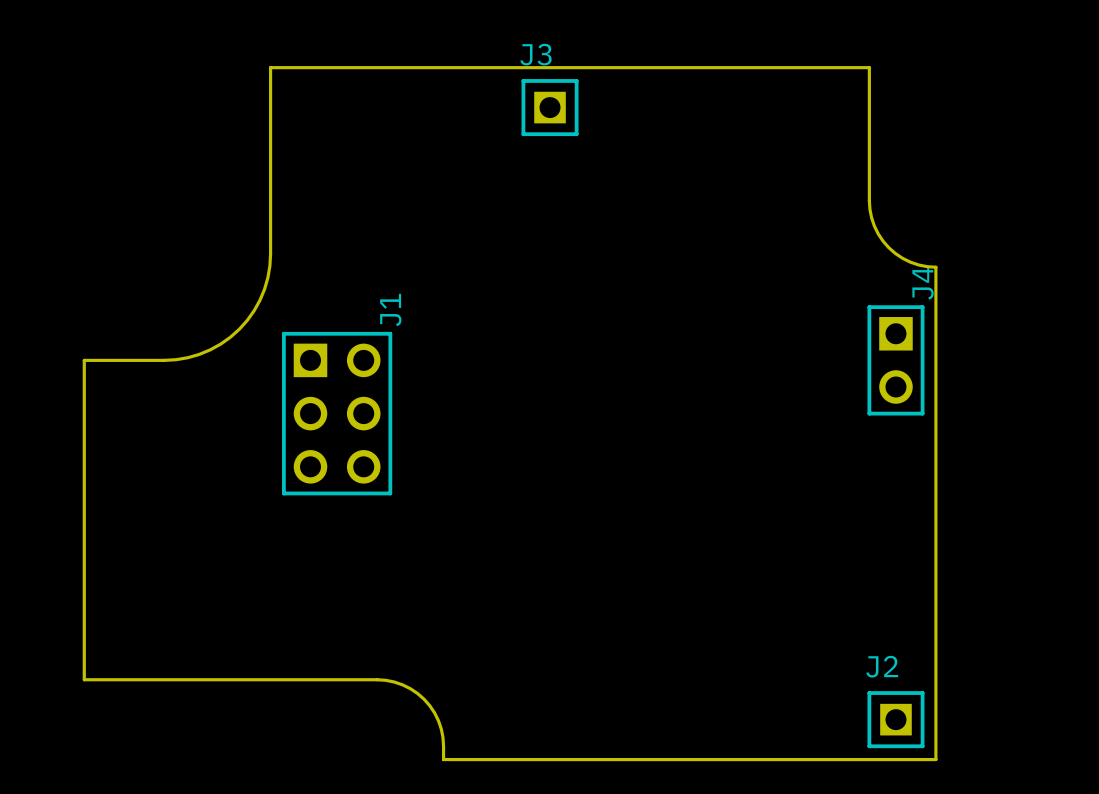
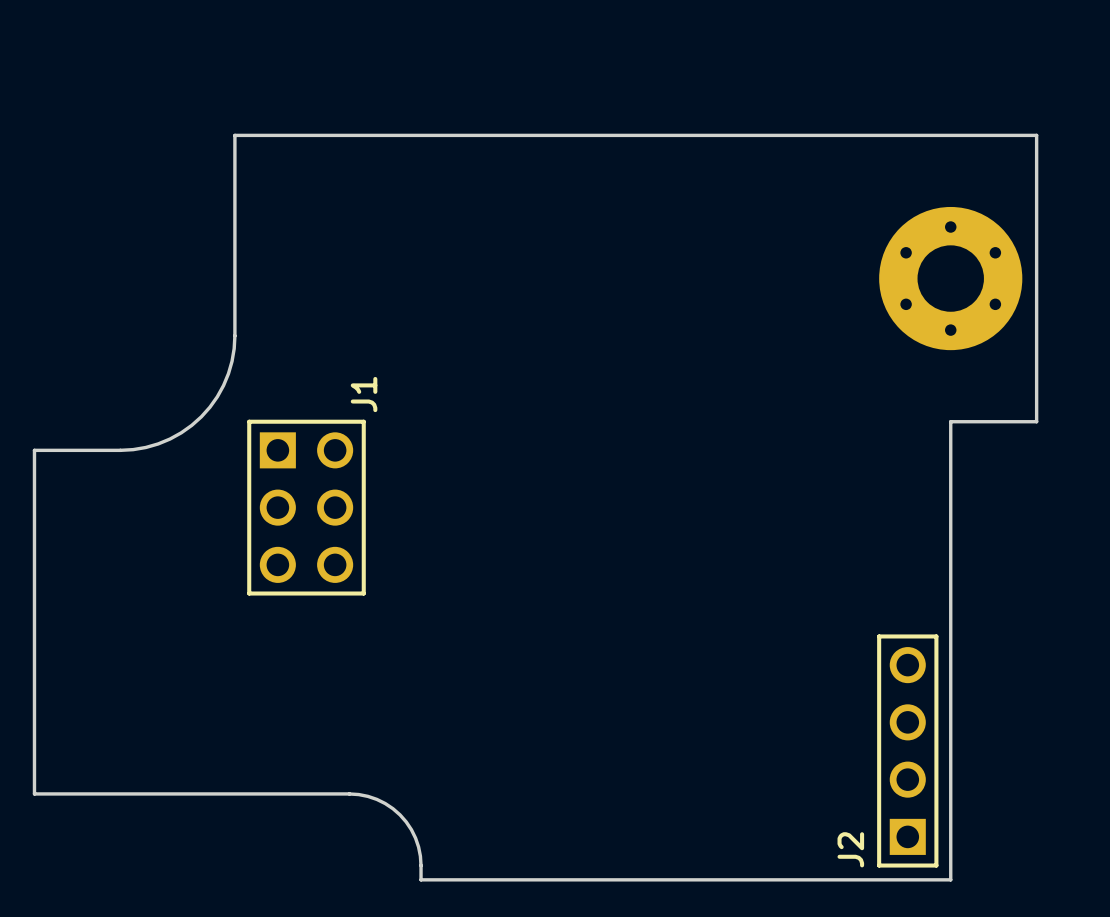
board edge: (869, 67) (869, 200) (871, 217) (878, 233) (895, 253) (910, 262) (935, 267) -> (879, 135) (1036, 135) (1036, 421) (950, 421)
J3: (550, 107) -> none
part: none -> (950, 278)
board edge: (935, 267) (935, 333) -> none
J4: (895, 360) -> none
J2 name position: J2 (882, 666) -> J2 (850, 849)
J2 footprint: [867, 691, 925, 749] -> [877, 634, 939, 868]

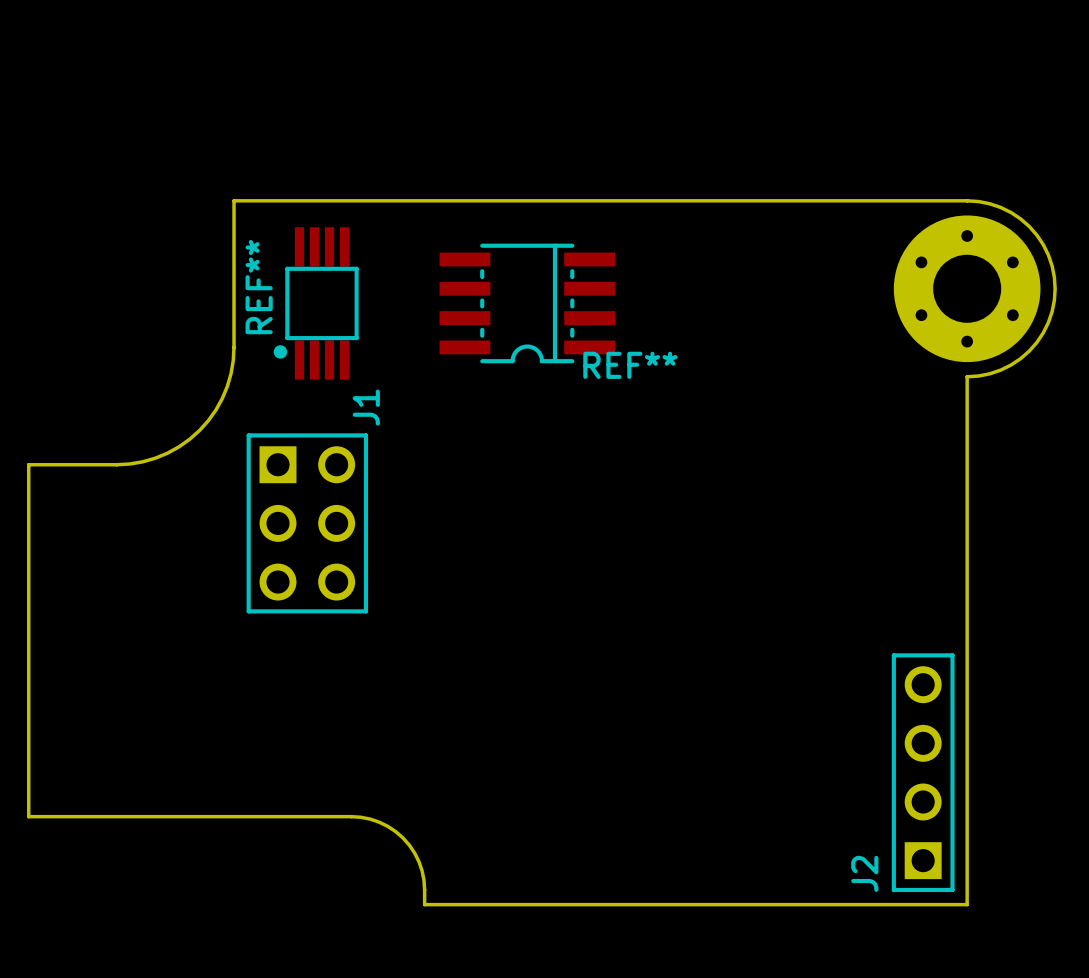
board edge: (234, 192) (234, 135) (1036, 135) (1036, 421) (950, 421) -> (234, 200) (967, 200) (989, 203) (1000, 207) (1020, 218) (1029, 226) (1043, 244) (1052, 266) (1054, 277) (1054, 300) (1052, 311) (1043, 332) (1029, 350) (1011, 364) (1000, 370) (978, 376) (967, 376) (967, 435)
REF**: none -> (316, 303)
REF**: none -> (527, 303)

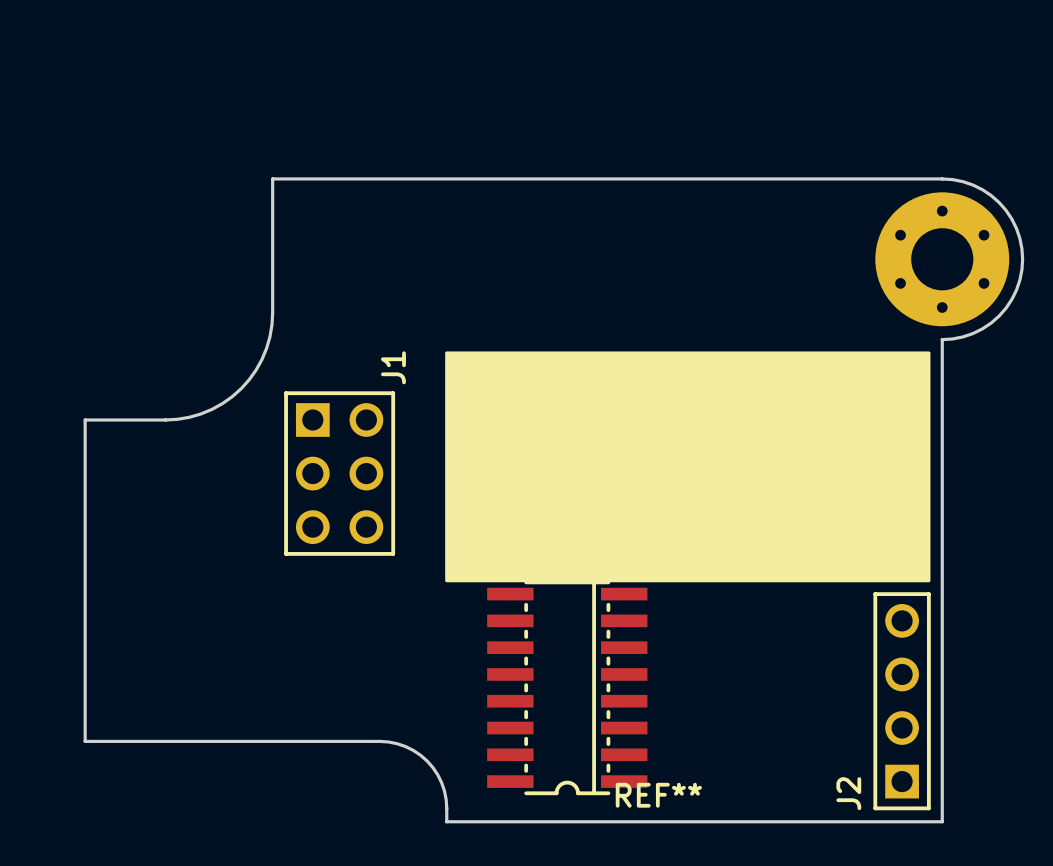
REF**: (316, 303) -> none
REF**: (527, 303) -> none
drawing: none -> [445, 351, 931, 583]
REF**: none -> (567, 687)

